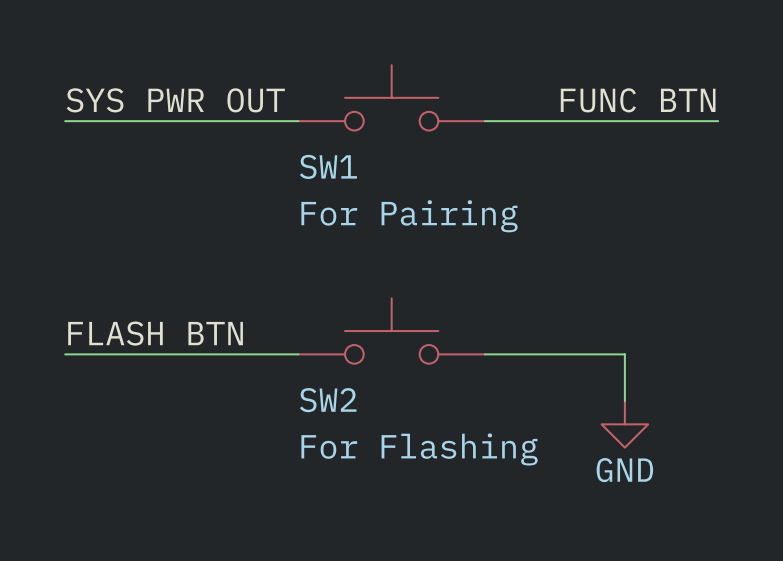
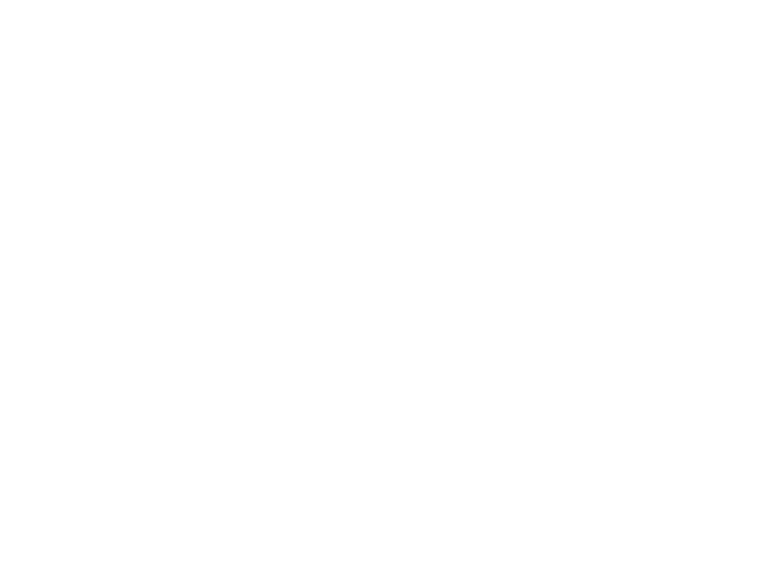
SW1: For Pairing (391, 97) -> none
label: SYS PWR OUT (175, 100) -> none
label: FUNC BTN (638, 100) -> none
wire: (65, 121) (298, 121) -> none
wire: (484, 121) (718, 121) -> none
SW2: For Flashing (391, 331) -> none
label: FLASH BTN (155, 333) -> none
wire: (65, 354) (298, 354) -> none
wire: (484, 354) (624, 354) (624, 401) -> none
power symbol: GND (624, 424) -> none

